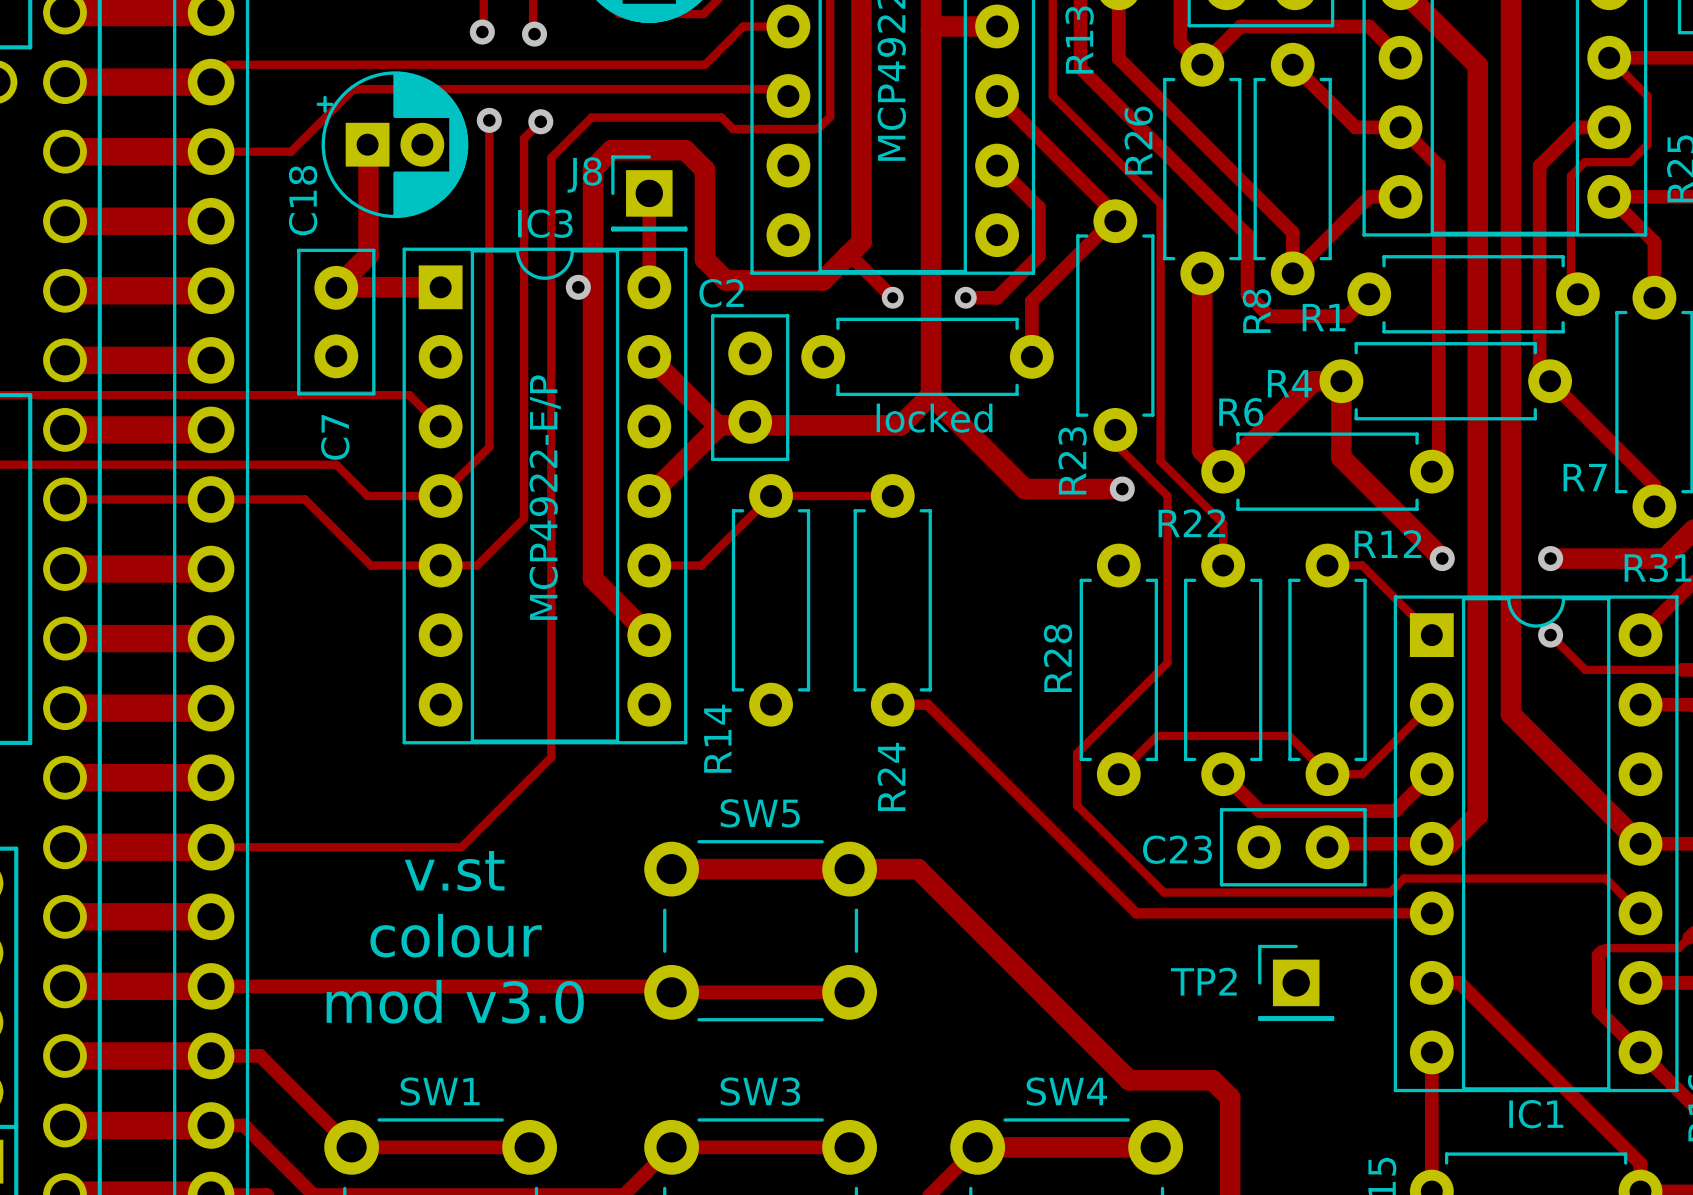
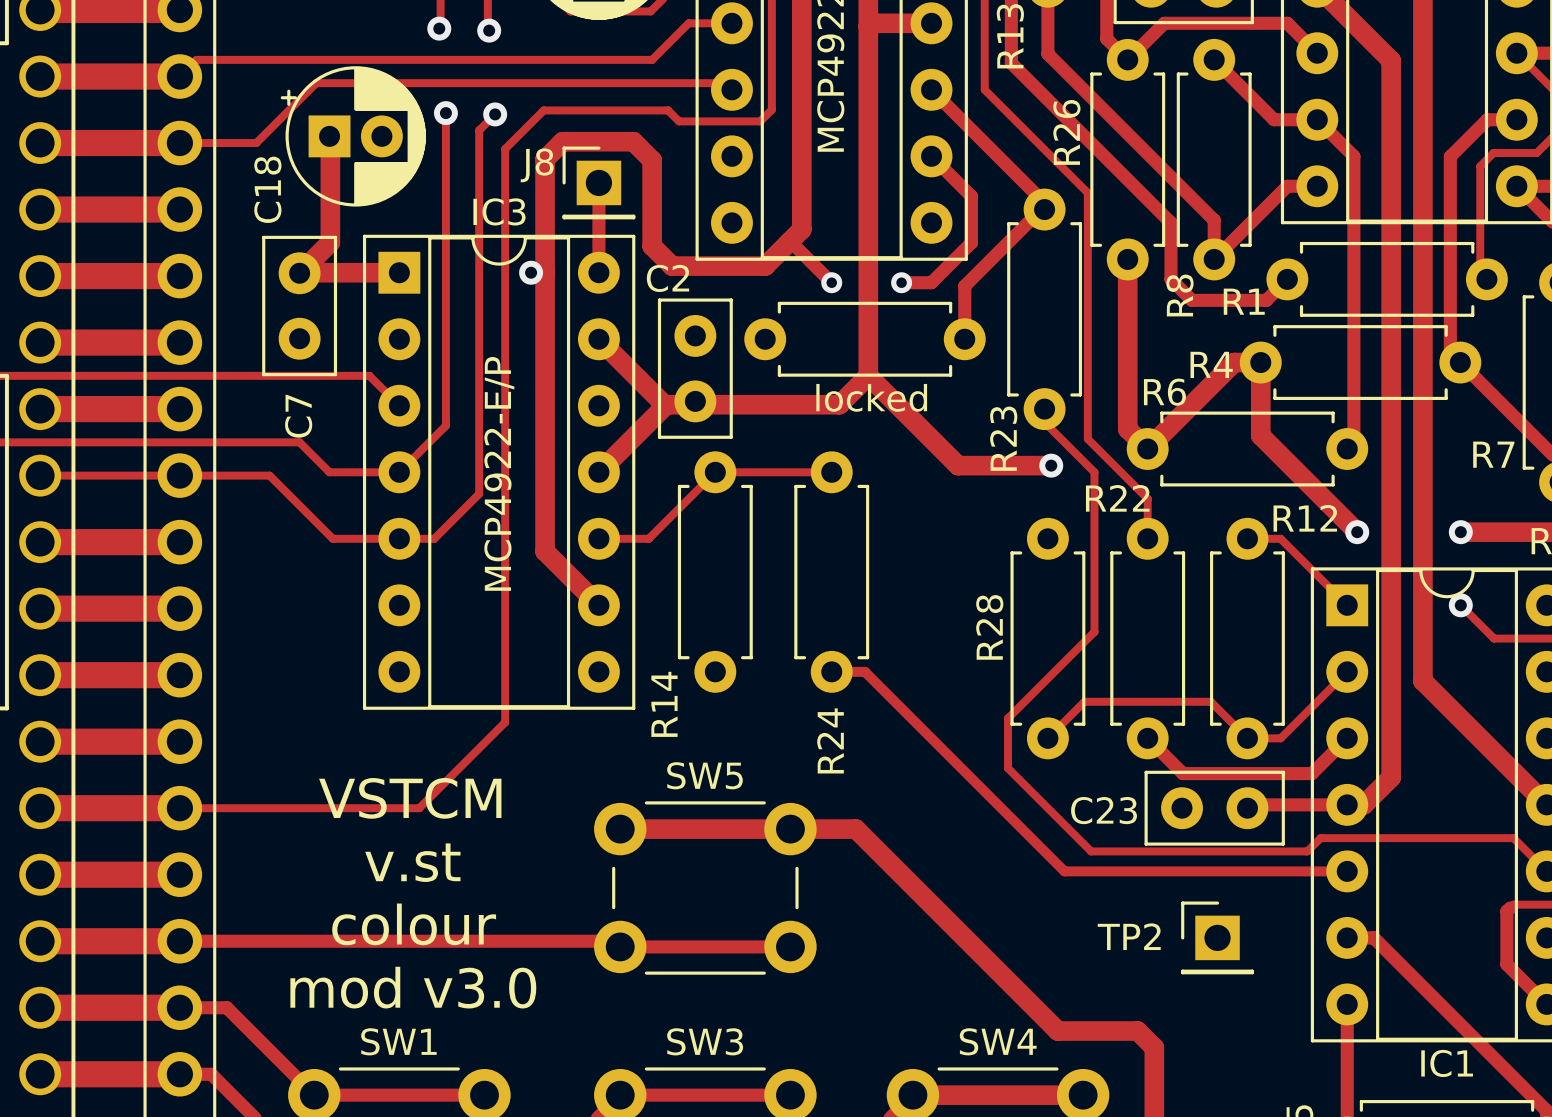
text: none -> VSTCM (410, 798)
text position: v.st (454, 871) -> v.st (412, 862)
text position: colour (456, 935) -> colour (414, 924)
text position: mod v3.0 (455, 1001) -> mod v3.0 (413, 987)

